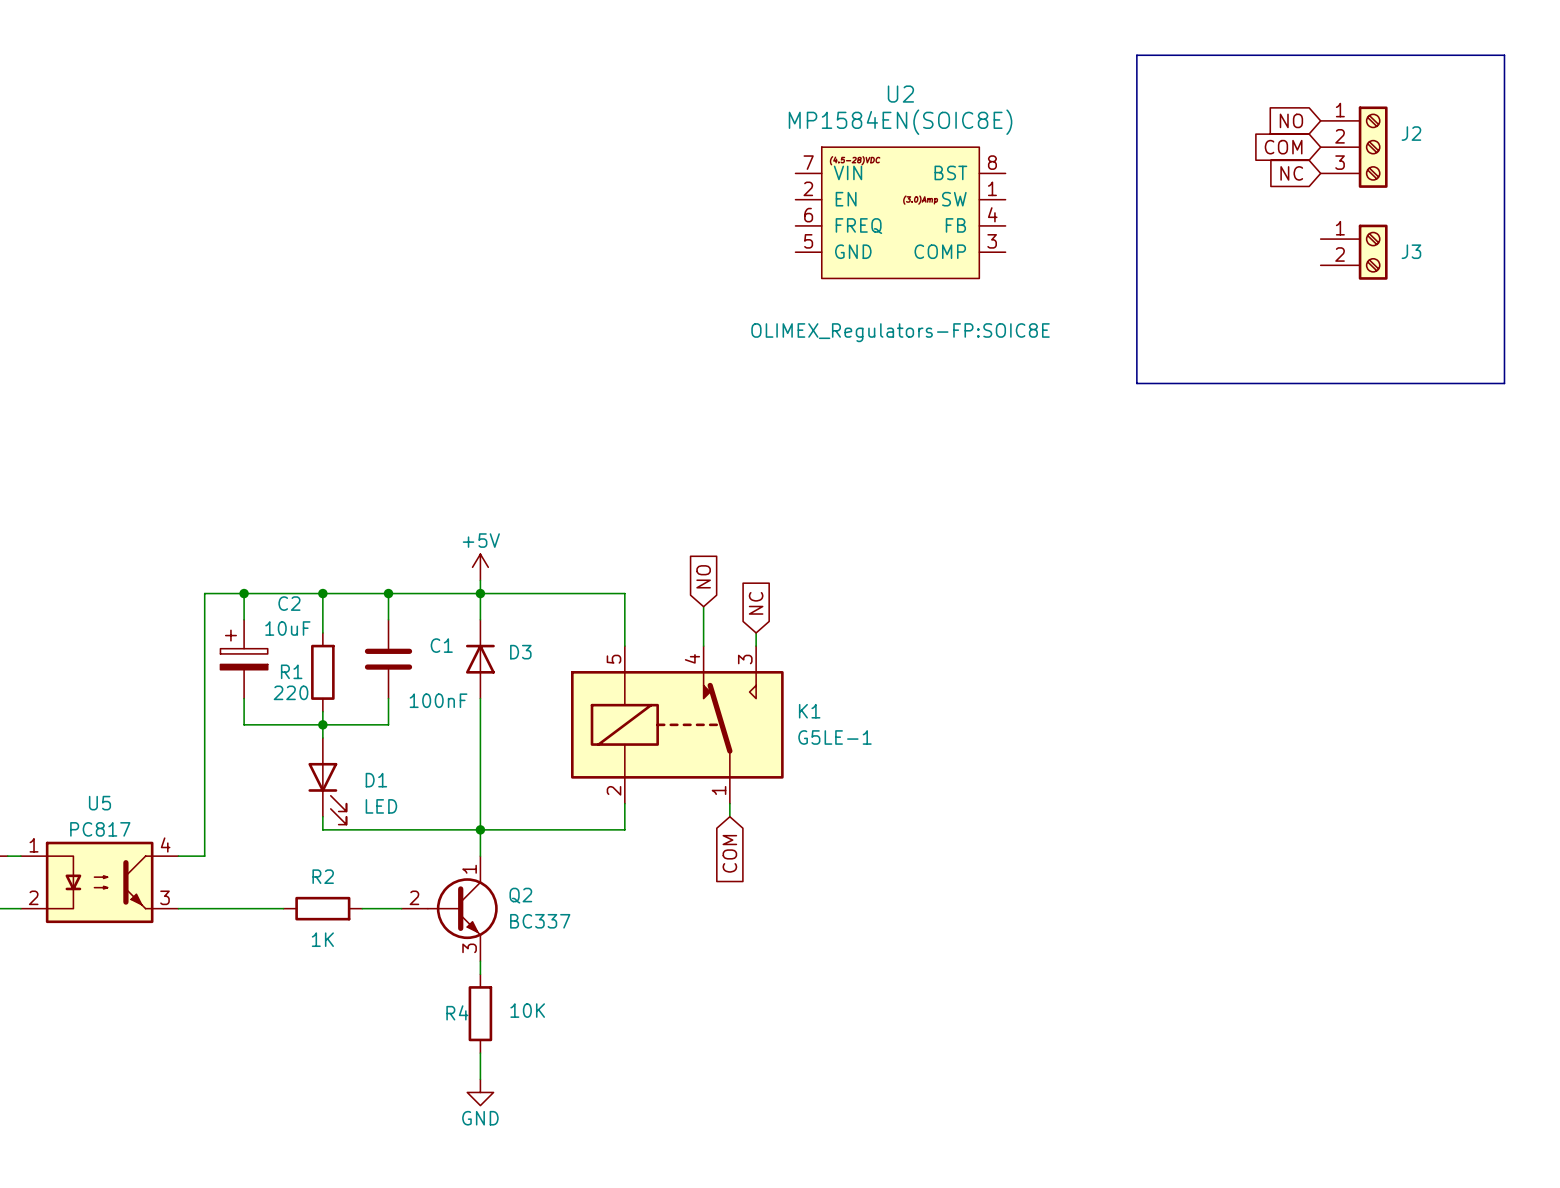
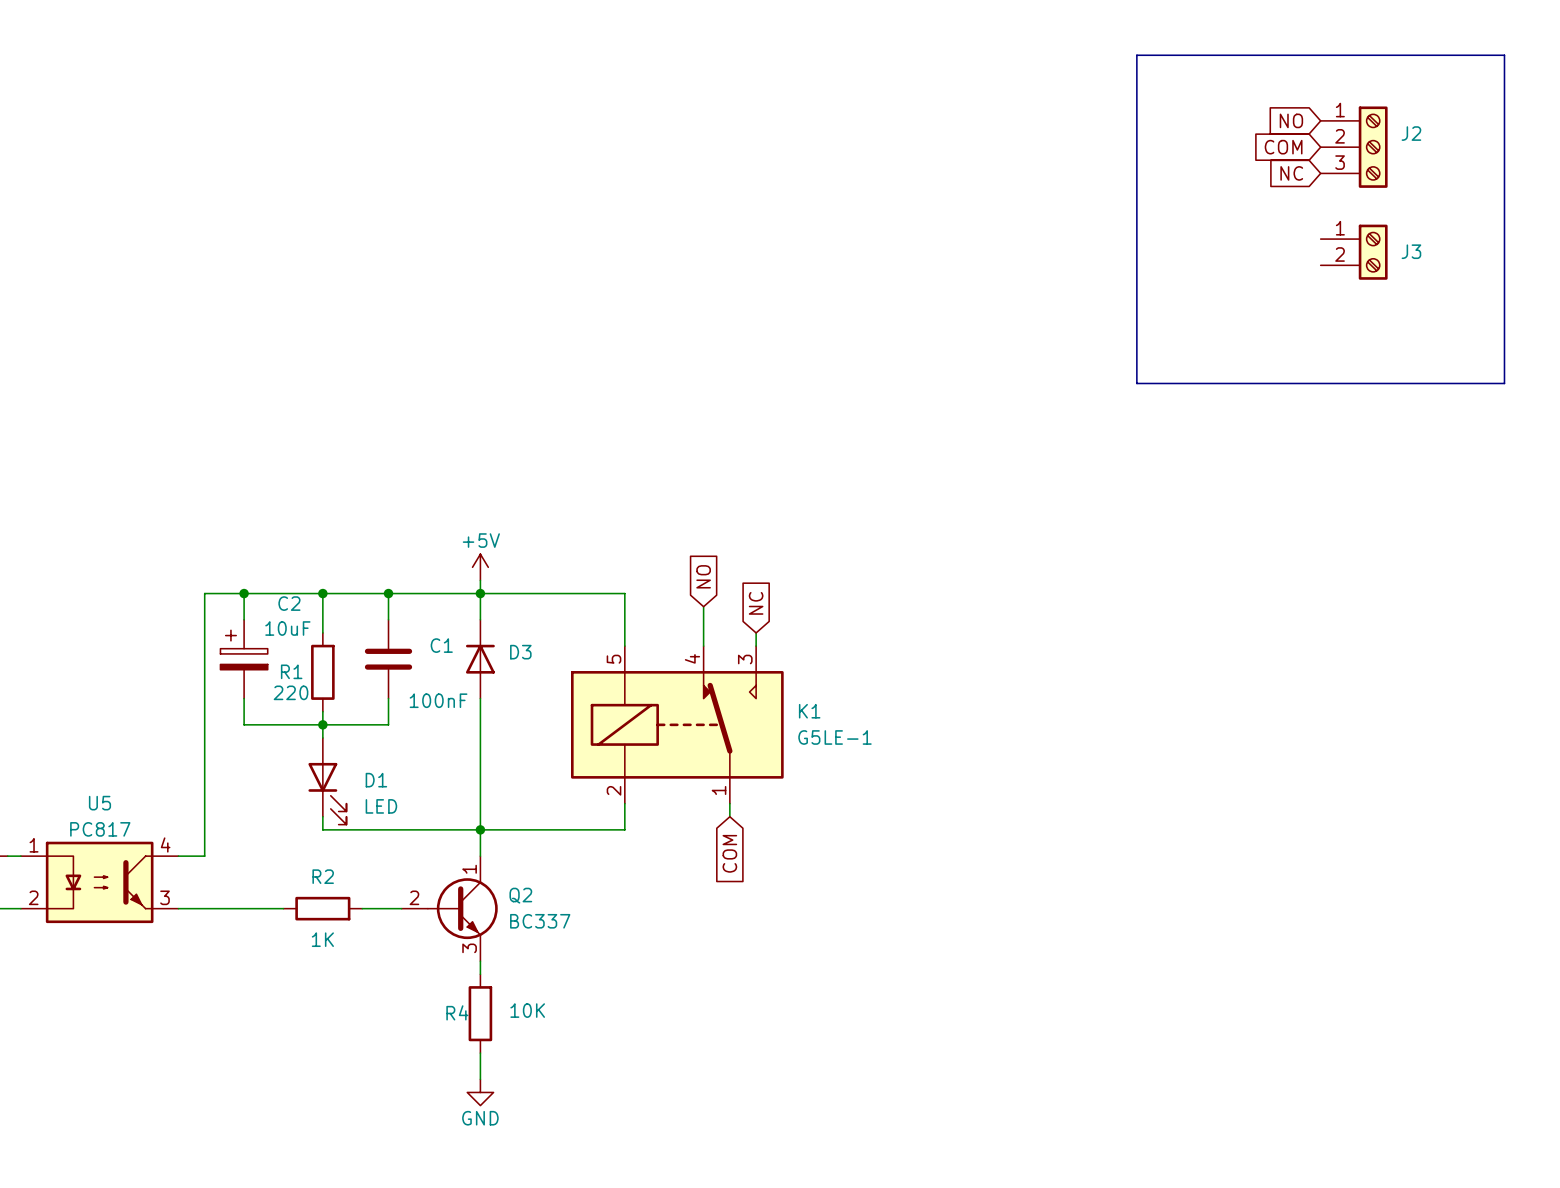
U2: MP1584EN(SOIC8E) (900, 212) -> none

